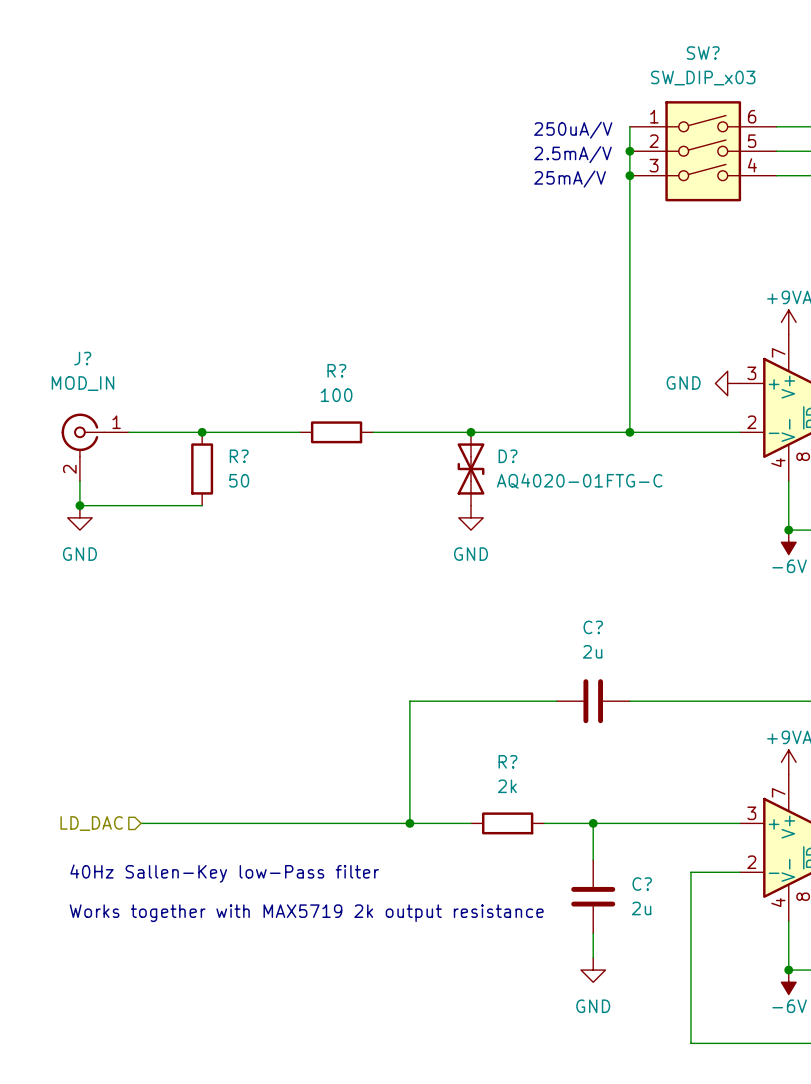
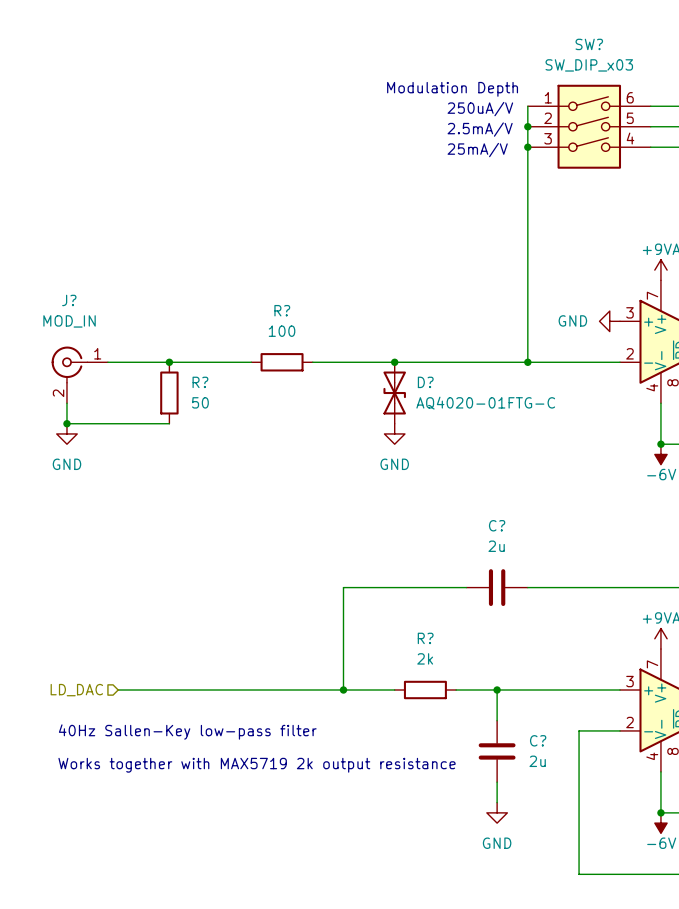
text: none -> Modulation Depth (452, 89)
text: 40Hz Sallen-Key low-Pass filter (224, 873) -> 40Hz Sallen-Key low-pass filter (187, 732)

